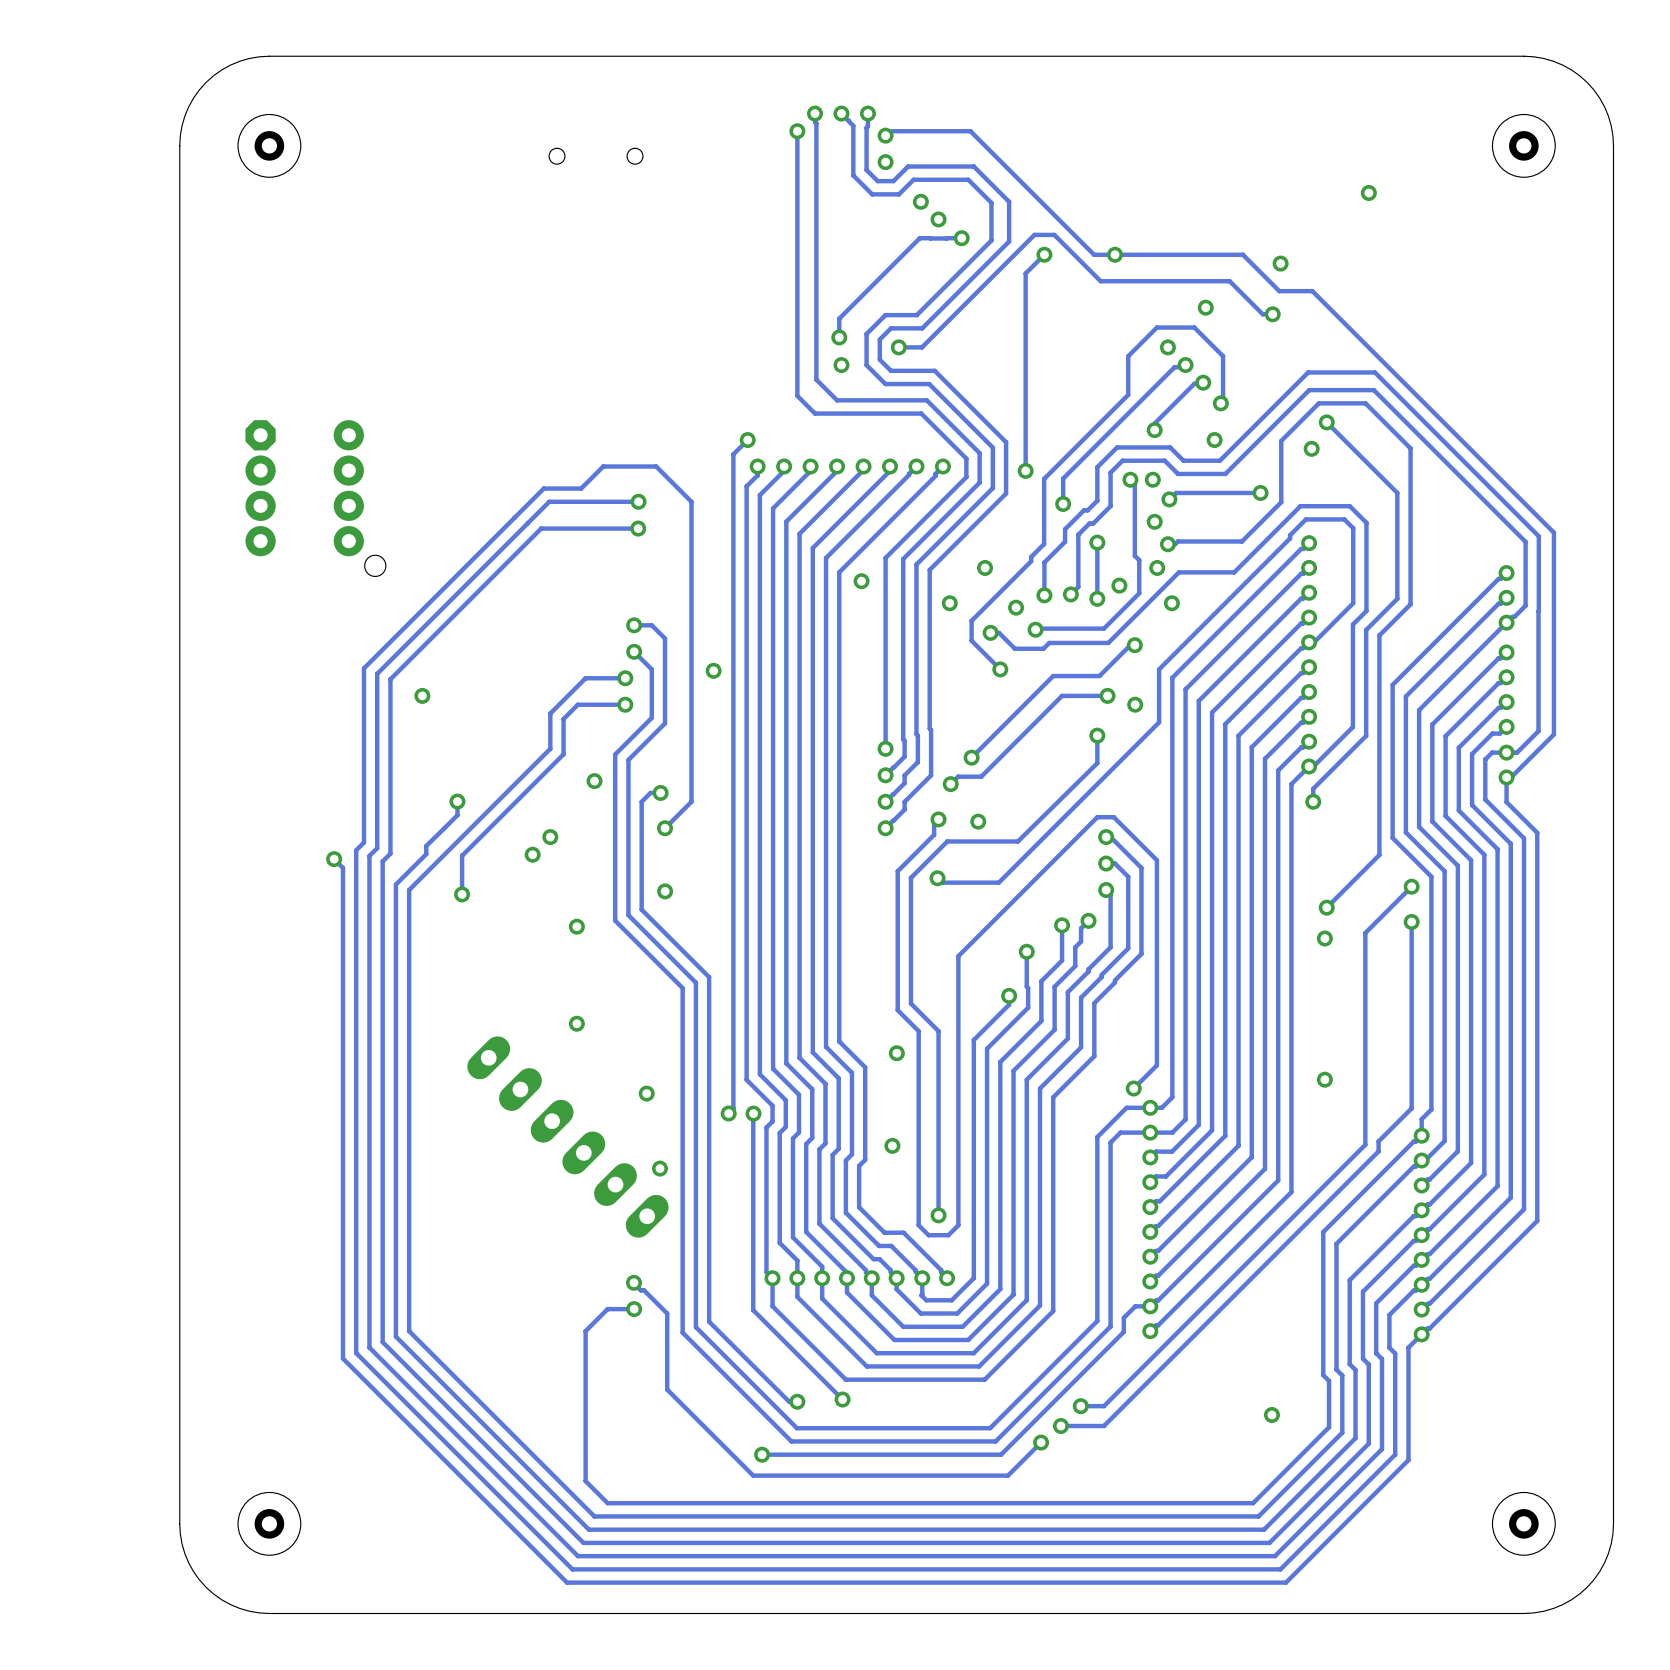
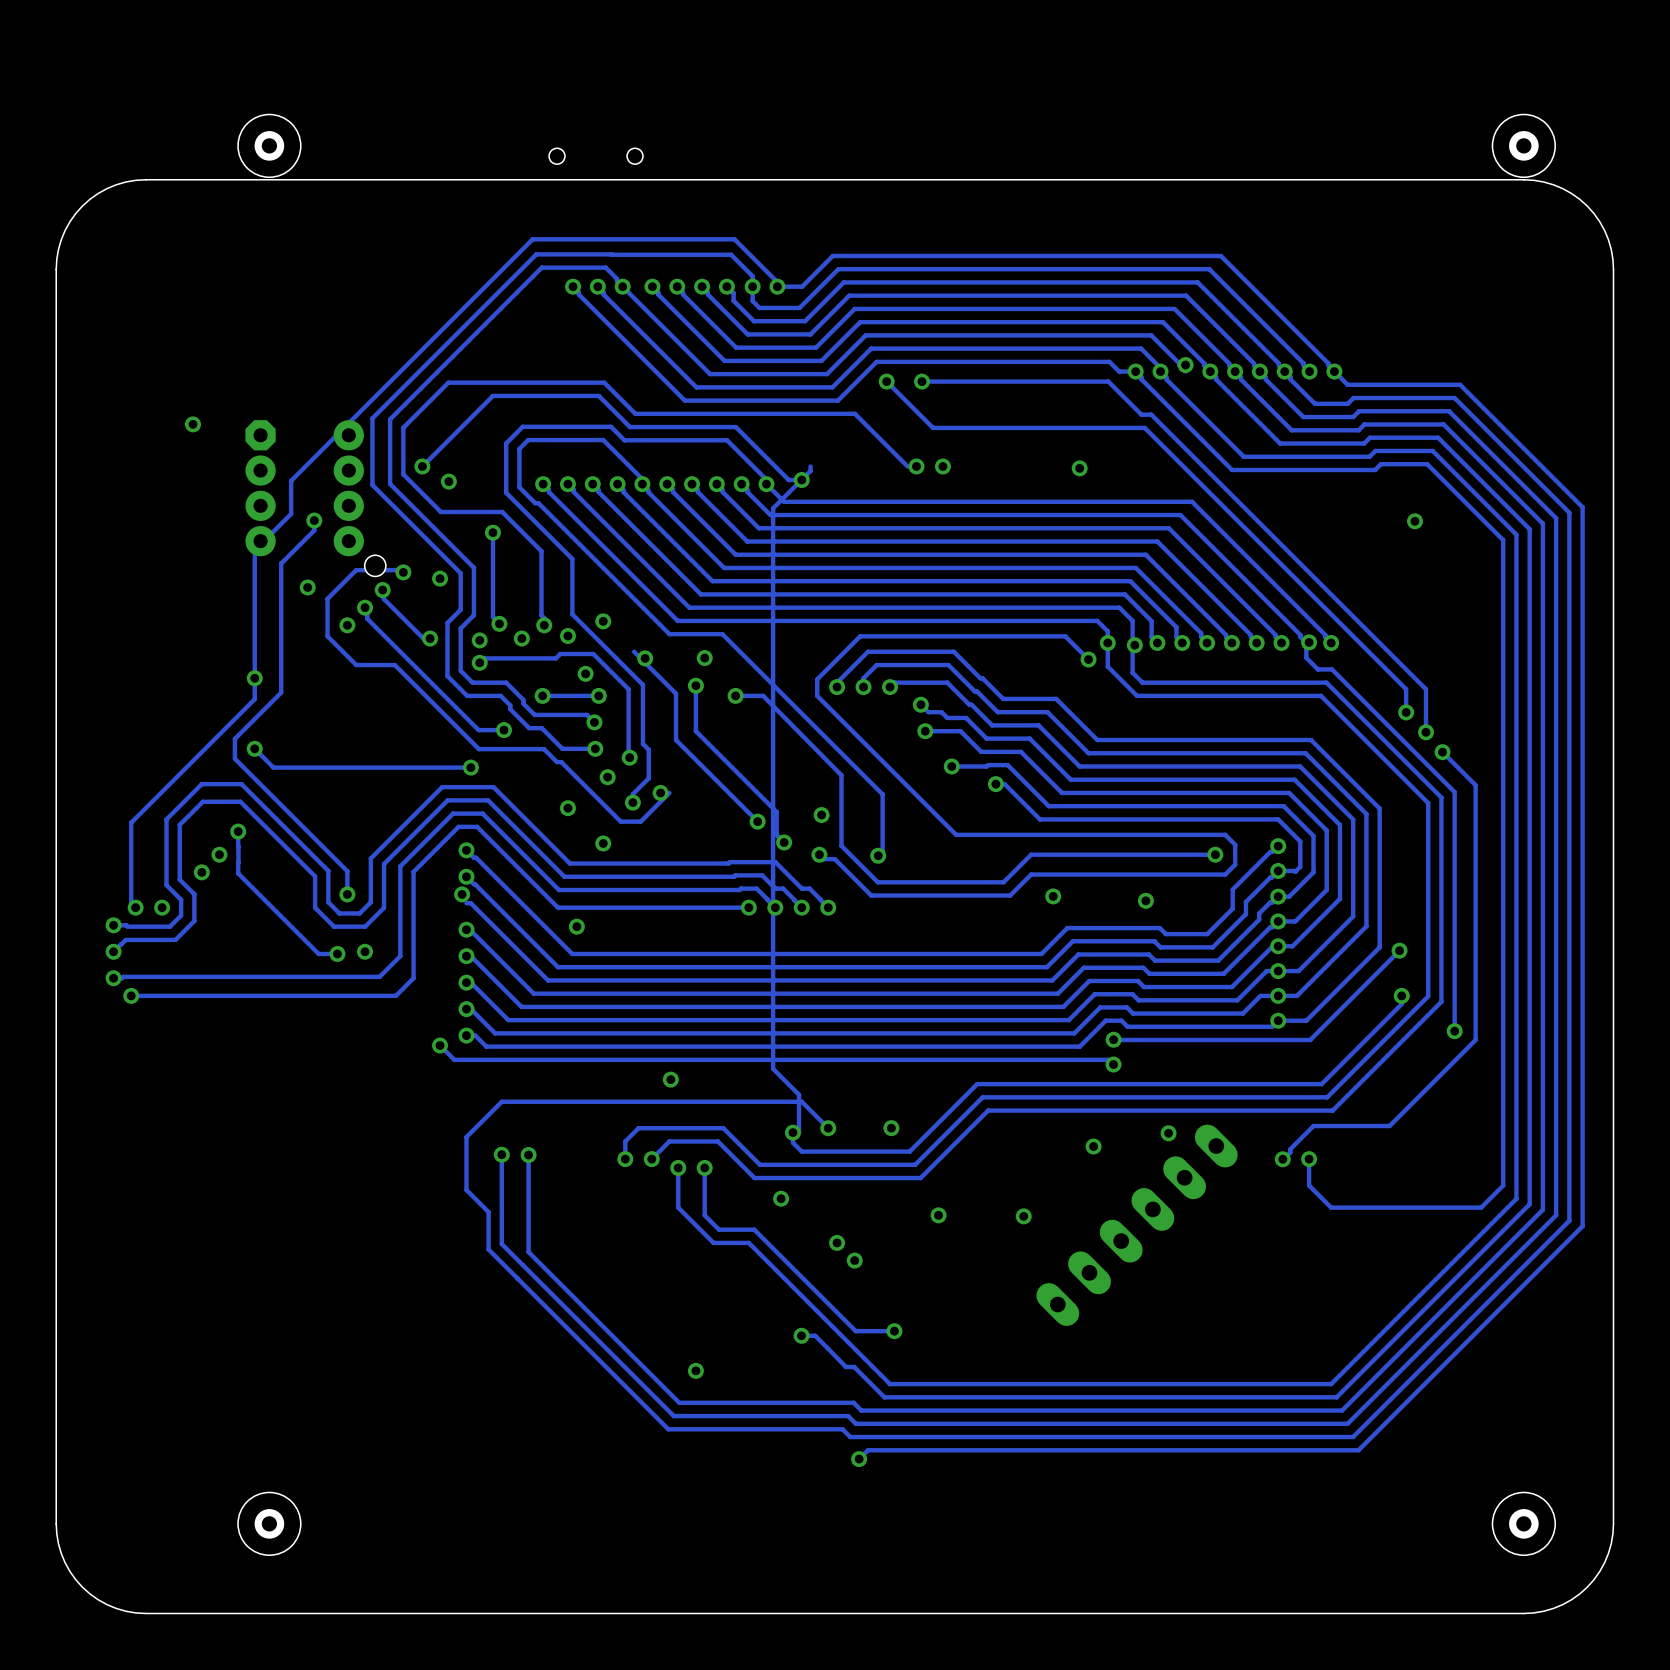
track: (815, 113) (816, 379) (837, 400) (926, 400) (979, 453) (979, 482) (903, 559) (904, 756) (885, 775) -> none
via: (815, 113) -> none
track: (841, 113) (853, 125) (853, 175) (872, 194) (898, 194) (913, 179) (968, 179) (991, 202) (991, 240) (916, 315) (885, 315) (866, 334) (866, 365) (885, 384) (929, 384) (992, 447) (992, 488) (916, 564) (917, 762) (904, 775) (904, 783) (885, 801) -> none
via: (841, 113) -> none
track: (867, 113) (866, 169) (877, 181) (893, 181) (908, 166) (973, 166) (1009, 201) (1009, 241) (922, 328) (890, 328) (879, 339) (879, 359) (890, 370) (934, 370) (1006, 442) (1006, 493) (929, 569) (931, 775) (904, 801) (904, 809) (885, 828) -> none
via: (867, 113) -> none
track: (797, 131) (797, 395) (815, 413) (921, 413) (966, 458) (966, 477) (885, 557) (885, 748) -> none
via: (797, 131) -> none
track: (885, 135) (890, 131) (970, 131) (1094, 254) (1242, 254) (1279, 291) (1312, 291) (1553, 532) (1553, 734) (1507, 780) (1506, 777) (1506, 802) (1537, 832) (1537, 1220) (1408, 1347) (1408, 1460) (1285, 1582) (567, 1582) (342, 1358) (342, 867) (334, 859) -> none
via: (885, 135) -> none
via: (885, 162) -> none
via: (1368, 192) -> none
via: (920, 201) -> none
via: (938, 219) -> none
track: (961, 238) (919, 238) (839, 318) (839, 337) -> none
via: (961, 238) -> none
track: (1044, 254) (1025, 273) (1025, 470) -> none
via: (1044, 254) -> none
via: (1114, 254) -> none
via: (1280, 263) -> none
board edge: (1613, 269) (1613, 145) (1608, 116) (1599, 98) (1579, 75) (1562, 65) (1533, 56) (269, 56) (249, 58) (230, 65) (206, 82) (188, 106) (182, 125) (179, 145) (179, 1523) (182, 1543) (188, 1562) (206, 1587) (230, 1604) (249, 1611) (269, 1613) -> (1613, 269) (1611, 249) (1604, 230) (1587, 206) (1562, 188) (1543, 182) (1523, 179) (145, 179) (125, 182) (106, 188) (82, 206) (65, 230) (58, 249) (56, 269) (56, 1533) (65, 1562) (75, 1579) (98, 1599) (116, 1608) (145, 1613) (269, 1613)
track: none -> (573, 286) (684, 400) (837, 400) (876, 361) (1109, 361) (1119, 371) (1135, 371) (1232, 469) (1375, 469) (1380, 464) (1427, 464) (1503, 540) (1503, 1185) (1481, 1207) (1331, 1207) (1309, 1185) (1309, 1159)
via: none -> (573, 286)
track: none -> (597, 286) (696, 387) (832, 387) (871, 348) (1141, 348) (1160, 368) (1160, 371) (1166, 379) (1243, 456) (1369, 456) (1375, 450) (1432, 450) (1516, 534) (1516, 1198) (1331, 1384) (890, 1384) (748, 1242) (713, 1242) (678, 1207) (678, 1167)
via: none -> (597, 286)
via: none -> (622, 286)
track: none -> (652, 286) (724, 360) (821, 360) (860, 322) (1163, 322) (1204, 363) (1216, 379) (1280, 443) (1364, 443) (1369, 437) (1438, 437) (1529, 529) (1529, 1204) (1336, 1397) (884, 1397) (854, 1366) (845, 1366) (815, 1335) (801, 1335)
via: none -> (652, 286)
track: none -> (677, 286) (736, 347) (816, 347) (854, 308) (1174, 308) (1291, 430) (1358, 430) (1364, 424) (1443, 424) (1542, 523) (1542, 1209) (1342, 1410) (861, 1410) (853, 1402) (679, 1402) (528, 1252) (528, 1155)
via: none -> (677, 286)
track: none -> (702, 286) (747, 334) (810, 334) (849, 295) (1186, 295) (1254, 363) (1265, 379) (1303, 417) (1353, 417) (1359, 411) (1449, 411) (1556, 518) (1556, 1215) (1347, 1423) (855, 1423) (848, 1416) (673, 1416) (501, 1244) (501, 1154)
via: none -> (702, 286)
track: none -> (726, 286) (733, 293) (733, 300) (754, 321) (805, 321) (843, 282) (1197, 282) (1278, 363) (1290, 379) (1314, 403) (1347, 403) (1353, 398) (1454, 398) (1569, 512) (1569, 1220) (1353, 1437) (850, 1437) (842, 1429) (668, 1429) (488, 1249) (488, 1212) (466, 1189) (466, 1137) (501, 1101) (801, 1101) (828, 1128)
via: none -> (726, 286)
via: none -> (752, 286)
via: none -> (777, 286)
via: (1205, 307) -> none
track: (1272, 314) (1262, 314) (1229, 281) (1100, 281) (1054, 234) (1034, 234) (921, 347) (898, 347) -> none
via: (1272, 314) -> none
via: (839, 337) -> none
via: (898, 347) -> none
via: (1167, 347) -> none
via: (841, 365) -> none
track: (1185, 365) (1183, 367) (1174, 367) (1063, 478) (1063, 504) -> none
via: none -> (1135, 371)
via: none -> (1160, 371)
track: none -> (1185, 371) (1151, 335) (865, 335) (826, 374) (710, 374) (605, 267) (541, 267) (390, 419) (390, 483) (473, 567) (473, 615) (460, 628) (460, 670) (472, 682) (506, 682) (523, 700) (523, 703) (534, 714) (586, 714) (594, 722)
via: none -> (1235, 371)
via: none -> (1259, 371)
via: none -> (1284, 371)
track: none -> (1309, 371) (1209, 269) (838, 269) (799, 307) (759, 307) (752, 301) (752, 276) (731, 254) (536, 254) (372, 418) (372, 485) (460, 573) (460, 609) (447, 622) (447, 676) (467, 695) (500, 695) (510, 705) (510, 709) (529, 728) (541, 728) (562, 748) (595, 748)
via: none -> (1309, 371)
via: none -> (1334, 371)
track: none -> (886, 381) (933, 427) (1144, 427) (1406, 689) (1406, 712)
via: none -> (886, 381)
track: none -> (921, 381) (1108, 381) (1141, 414) (1151, 414) (1426, 689) (1426, 732)
via: none -> (921, 381)
track: (1203, 382) (1194, 383) (1154, 423) (1154, 430) -> none
via position: (1203, 382) -> (1210, 371)
track: (1220, 403) (1223, 400) (1223, 356) (1194, 327) (1156, 327) (1128, 356) (1128, 394) (1044, 478) (1044, 544) (1031, 557) (1031, 561) (971, 620) (971, 640) (1000, 669) -> none
via: (1220, 403) -> none
track: (1326, 422) (1397, 492) (1397, 598) (1366, 629) (1366, 735) (1313, 788) (1313, 801) -> none
via: (1326, 422) -> none
via: none -> (192, 424)
via: (1154, 430) -> none
track: (747, 440) (733, 454) (733, 1108) (728, 1113) -> none
via: (747, 440) -> none
via: (1214, 440) -> none
via: (1311, 448) -> none
track: none -> (422, 466) (492, 395) (598, 395) (629, 427) (735, 427) (788, 479) (801, 479)
via: none -> (422, 466)
track: (757, 466) (757, 475) (746, 486) (746, 1079) (772, 1105) (772, 1121) (766, 1127) (766, 1272) (772, 1278) (772, 1306) (845, 1379) (984, 1379) (1053, 1311) (1053, 1097) (1094, 1056) (1094, 1003) (1141, 953) (1141, 867) (1110, 837) (1106, 837) -> none
via: (757, 466) -> none
track: (784, 466) (784, 470) (759, 495) (759, 1074) (785, 1100) (785, 1126) (779, 1133) (779, 1242) (797, 1260) (797, 1296) (866, 1366) (979, 1366) (1040, 1305) (1040, 1088) (1081, 1047) (1081, 997) (1128, 948) (1128, 876) (1114, 863) (1106, 863) -> none
via: (784, 466) -> none
via position: (810, 466) -> (801, 479)
track: (837, 466) (837, 470) (786, 521) (786, 1063) (812, 1089) (812, 1137) (806, 1144) (806, 1231) (847, 1272) (847, 1292) (894, 1339) (968, 1339) (1013, 1294) (1013, 1070) (1054, 1029) (1054, 986) (1075, 966) (1075, 947) (1081, 941) (1081, 928) (1088, 920) -> none
via: (837, 466) -> none
track: (863, 466) (863, 469) (799, 533) (799, 1057) (825, 1083) (825, 1143) (819, 1149) (819, 1223) (866, 1270) (871, 1278) (871, 1295) (903, 1326) (962, 1326) (1000, 1289) (1000, 1062) (1041, 1020) (1041, 981) (1062, 960) (1062, 925) -> none
via: (863, 466) -> none
track: (890, 466) (890, 470) (812, 548) (812, 1052) (838, 1078) (838, 1148) (832, 1154) (832, 1218) (873, 1259) (879, 1259) (890, 1270) (896, 1278) (896, 1289) (920, 1313) (957, 1313) (987, 1283) (987, 1048) (1028, 1007) (1026, 951) -> none
via: (890, 466) -> none
track: none -> (907, 466) (854, 413) (635, 413) (604, 382) (448, 382) (403, 427) (403, 474) (440, 512) (502, 512) (541, 551) (541, 615) (544, 618) (544, 625)
track: (916, 466) (826, 558) (826, 1046) (851, 1072) (851, 1154) (845, 1160) (845, 1212) (879, 1245) (891, 1245) (915, 1270) (922, 1278) (921, 1295) (926, 1300) (951, 1300) (973, 1278) (973, 1040) (1009, 1004) (1009, 995) -> none
track: (942, 466) (839, 572) (839, 1041) (865, 1067) (865, 1159) (859, 1165) (859, 1207) (884, 1232) (903, 1232) (947, 1278) -> none
via: none -> (1079, 468)
via: (1025, 470) -> none
track: (1130, 479) (1134, 484) (1134, 555) (1139, 560) (1139, 593) (1103, 628) (1035, 629) -> none
via: (1130, 479) -> none
via: (1152, 479) -> none
via: none -> (448, 481)
track: none -> (543, 484) (677, 620) (1097, 620) (1107, 631) (1107, 666) (1137, 695) (1321, 695) (1428, 803) (1428, 996) (1327, 1097) (982, 1097) (915, 1164) (759, 1164) (723, 1128) (638, 1128) (625, 1141) (625, 1159)
via: none -> (543, 484)
track: none -> (567, 484) (689, 607) (1119, 607) (1132, 620) (1132, 672) (1142, 682) (1326, 682) (1441, 797) (1441, 1001) (1332, 1110) (988, 1110) (920, 1178) (754, 1178) (717, 1141) (669, 1141) (651, 1159)
via: none -> (567, 484)
track: none -> (592, 484) (700, 594) (1124, 594) (1151, 621) (1151, 637) (1157, 642)
via: none -> (592, 484)
track: none -> (617, 484) (712, 581) (1130, 581) (1176, 627) (1176, 637) (1182, 642)
via: none -> (617, 484)
via: none -> (642, 484)
track: none -> (667, 484) (735, 554) (1145, 554) (1231, 642)
via: none -> (667, 484)
track: none -> (692, 484) (747, 541) (1157, 541) (1256, 642)
via: none -> (692, 484)
track: none -> (716, 484) (758, 528) (1168, 528) (1281, 642)
via: none -> (716, 484)
track: none -> (741, 484) (770, 515) (1180, 515) (1300, 635) (1306, 642) (1306, 657) (1317, 669) (1331, 669) (1454, 792) (1454, 1031)
via: none -> (741, 484)
via: none -> (766, 484)
track: (1260, 492) (1176, 492) (1169, 499) -> none
via: (1260, 492) -> none
via: (1169, 499) -> none
track: (638, 501) (549, 501) (377, 673) (377, 848) (369, 855) (369, 1347) (577, 1556) (1275, 1556) (1381, 1449) (1381, 1359) (1376, 1353) (1376, 1303) (1413, 1265) (1429, 1254) (1497, 1186) (1497, 849) (1458, 810) (1458, 747) (1506, 702) -> none
via: (638, 501) -> none
via: (1063, 504) -> none
track: none -> (314, 520) (314, 530) (281, 563) (281, 692) (234, 738) (234, 758) (347, 871) (347, 894)
via: none -> (314, 520)
via: (1154, 521) -> none
via: none -> (1414, 521)
track: (638, 528) (541, 528) (390, 679) (390, 853) (382, 861) (382, 1342) (583, 1542) (1269, 1542) (1368, 1443) (1368, 1364) (1362, 1358) (1362, 1291) (1484, 1174) (1484, 854) (1445, 816) (1445, 736) (1506, 677) -> none
via: (638, 528) -> none
track: none -> (492, 532) (492, 617) (499, 623)
via: none -> (492, 532)
track: (1097, 542) (1097, 598) -> none
via: (1097, 542) -> none
track: (1309, 543) (1172, 677) (1172, 1097) (1161, 1107) (1126, 1107) (1097, 1137) (1097, 1321) (990, 1428) (796, 1428) (695, 1327) (695, 982) (628, 915) (628, 759) (665, 723) (665, 638) (651, 625) (634, 625) -> none
via: (1309, 543) -> none
track: (1167, 544) (1175, 544) (1177, 541) (1241, 541) (1281, 502) (1281, 440) (1318, 403) (1365, 403) (1410, 448) (1410, 604) (1379, 635) (1379, 854) (1326, 907) -> none
via: (1167, 544) -> none
via: (985, 567) -> none
via: (1157, 567) -> none
track: (1309, 567) (1185, 689) (1185, 1119) (1172, 1132) (1120, 1132) (1110, 1142) (1110, 1326) (995, 1441) (791, 1441) (682, 1332) (682, 988) (615, 920) (615, 754) (651, 717) (651, 669) -> (757, 821) (676, 740) (676, 693) (651, 669)
via: (1309, 567) -> none
track: none -> (403, 572) (400, 570) (356, 570) (327, 598) (327, 636) (356, 665) (394, 665) (478, 749) (544, 749) (557, 762) (561, 762) (620, 821) (640, 821) (669, 792)
via: none -> (403, 572)
track: (1506, 573) (1392, 684) (1392, 837) (1431, 876) (1431, 1109) (1421, 1119) (1421, 1135) (1323, 1232) (1323, 1375) (1329, 1380) (1329, 1427) (1253, 1503) (607, 1503) (585, 1481) (585, 1331) (607, 1309) (634, 1309) -> none
via: (1506, 573) -> none
via: none -> (440, 578)
via: (861, 581) -> none
via: (1119, 585) -> none
via: none -> (307, 587)
track: none -> (382, 590) (383, 598) (423, 638) (430, 638)
via: none -> (382, 590)
track: (1309, 592) (1198, 700) (1198, 1124) (1172, 1151) (1156, 1151) (1150, 1157) -> none
via: (1309, 592) -> none
track: (1070, 594) (1078, 586) (1078, 534) (1089, 523) (1093, 523) (1110, 506) (1110, 472) (1122, 460) (1164, 460) (1178, 473) (1225, 473) (1309, 390) (1373, 390) (1525, 541) (1525, 605) (1419, 710) (1419, 826) (1457, 865) (1457, 1151) (1421, 1185) -> none
via: (1070, 594) -> none
track: (1044, 595) (1044, 562) (1065, 541) (1065, 529) (1083, 510) (1087, 510) (1097, 500) (1097, 467) (1117, 447) (1170, 447) (1183, 460) (1219, 460) (1308, 372) (1374, 372) (1538, 536) (1538, 731) (1517, 752) (1492, 752) (1485, 759) (1485, 799) (1524, 838) (1524, 1209) (1421, 1309) -> none
via: (1044, 595) -> none
track: (1506, 597) (1405, 696) (1405, 832) (1444, 871) (1444, 1141) (1425, 1160) (1421, 1160) (1413, 1166) (1336, 1243) (1336, 1369) (1342, 1375) (1342, 1432) (1258, 1516) (594, 1516) (409, 1331) (409, 890) (550, 748) (550, 713) (585, 678) (625, 678) -> none
via: (1506, 597) -> none
via: (1097, 598) -> none
via: (949, 603) -> none
via: (1171, 603) -> none
track: none -> (365, 607) (367, 609) (367, 618) (478, 730) (504, 730)
via: none -> (365, 607)
via: (1016, 607) -> none
track: (1309, 617) (1212, 712) (1212, 1130) (1165, 1176) (1156, 1176) (1150, 1182) -> none
via: (1309, 617) -> none
via: none -> (603, 621)
via: (1506, 622) -> none
via: none -> (499, 623)
via: none -> (347, 625)
via: none -> (544, 625)
via: (634, 625) -> none
via: (1035, 629) -> none
track: (990, 632) (999, 632) (1014, 648) (1043, 648) (1049, 642) (1108, 642) (1178, 572) (1234, 572) (1300, 506) (1349, 506) (1366, 522) (1366, 611) (1352, 624) (1352, 727) (1313, 766) (1309, 766) (1291, 784) (1291, 1192) (1150, 1331) -> none
via: (990, 632) -> none
via: none -> (567, 636)
via: none -> (430, 638)
via: none -> (521, 638)
via: none -> (479, 640)
via: none -> (1107, 642)
via: none -> (1157, 642)
via: none -> (1182, 642)
track: none -> (1207, 642) (1201, 637) (1201, 633) (1135, 567) (724, 567) (648, 492) (642, 484) (642, 479) (603, 440) (528, 440) (519, 448) (519, 487) (535, 503) (538, 503) (669, 634) (722, 634) (882, 794) (882, 851) (878, 855)
via: none -> (1207, 642)
via: none -> (1231, 642)
via: none -> (1256, 642)
via: none -> (1281, 642)
track: none -> (1331, 642) (1192, 501) (784, 501) (766, 484) (766, 479) (727, 440) (624, 440) (611, 426) (522, 426) (506, 443) (506, 492) (572, 559) (572, 614) (642, 684) (642, 743) (648, 749) (648, 778) (632, 794) (632, 802)
via: none -> (1331, 642)
track: (1134, 645) (1130, 645) (1099, 676) (1053, 676) (971, 757) -> none
via position: (634, 651) -> (645, 658)
track: (1506, 652) (1432, 724) (1432, 821) (1471, 860) (1471, 1163) (1429, 1204) (1413, 1216) (1349, 1280) (1349, 1364) (1355, 1369) (1355, 1438) (1264, 1529) (588, 1529) (395, 1336) (395, 884) (426, 854) (426, 845) (457, 815) (457, 801) -> none
via: (1506, 652) -> none
track: none -> (1088, 659) (1065, 636) (860, 636) (817, 679) (817, 695) (956, 834) (1225, 834) (1235, 844) (1235, 864) (1225, 874) (1031, 874) (1010, 895) (871, 895) (834, 859) (823, 859) (819, 854)
via: none -> (1088, 659)
track: none -> (479, 662) (484, 658) (555, 658) (560, 653) (593, 653) (628, 689) (629, 757)
via: none -> (479, 662)
track: (1309, 667) (1238, 735) (1238, 1145) (1150, 1231) -> none
via: (1309, 667) -> none
via: (1000, 669) -> none
via position: (713, 670) -> (704, 658)
via: none -> (585, 673)
via: (1506, 677) -> none
via: none -> (254, 678)
via: (625, 678) -> none
track: none -> (695, 685) (695, 731) (776, 811) (776, 835) (784, 842)
via: none -> (695, 685)
track: none -> (837, 687) (837, 682) (867, 651) (953, 651) (1003, 698) (1056, 698) (1097, 740) (1311, 740) (1379, 808) (1379, 947) (1306, 1020) (1278, 1020) (1272, 1026) (1127, 1026) (1121, 1020) (1105, 1020) (1079, 1046) (486, 1046) (475, 1035) (466, 1035)
via: none -> (837, 687)
track: none -> (863, 687) (863, 678) (876, 665) (948, 665) (997, 712) (1047, 712) (1088, 753) (1305, 753) (1366, 814) (1366, 926) (1296, 995) (1260, 995) (1242, 1013) (1133, 1013) (1126, 1007) (1100, 1007) (1074, 1033) (495, 1033) (470, 1009) (466, 1009)
via: none -> (863, 687)
track: none -> (890, 687) (894, 682) (947, 682) (992, 725) (1038, 725) (1079, 766) (1300, 766) (1353, 819) (1353, 916) (1298, 971) (1266, 971) (1237, 1000) (1138, 1000) (1132, 994) (1094, 994) (1068, 1020) (508, 1020) (470, 982) (466, 982)
via: none -> (890, 687)
track: (1309, 692) (1251, 747) (1251, 1157) (1150, 1256) -> none
via: (1309, 692) -> none
via: (422, 695) -> none
via: none -> (542, 695)
track: none -> (598, 695) (542, 695)
via: none -> (598, 695)
track: none -> (735, 695) (763, 695) (841, 775) (841, 845) (877, 882) (1003, 882) (1031, 854) (1215, 854)
via: none -> (735, 695)
track: (1107, 695) (1062, 695) (981, 776) (958, 776) (950, 784) -> none
via: (1107, 695) -> none
via: (1506, 702) -> none
track: (625, 704) (577, 704) (563, 719) (563, 754) (462, 855) (462, 894) -> none
via: (625, 704) -> none
track: none -> (920, 704) (928, 712) (941, 712) (947, 717) (966, 717) (986, 738) (1029, 738) (1070, 779) (1294, 779) (1339, 825) (1339, 898) (1292, 946) (1272, 946) (1231, 987) (1144, 987) (1137, 981) (1089, 981) (1063, 1006) (521, 1006) (470, 956) (466, 956)
via: none -> (920, 704)
via: (1135, 704) -> none
via: none -> (1406, 712)
track: (1309, 716) (1264, 758) (1264, 1168) (1150, 1281) -> none
via: (1309, 716) -> none
via: none -> (594, 722)
track: (1506, 726) (1499, 733) (1492, 733) (1472, 754) (1472, 805) (1510, 843) (1510, 1197) (1429, 1278) (1413, 1290) (1389, 1314) (1389, 1347) (1395, 1353) (1395, 1454) (1280, 1569) (572, 1569) (356, 1353) (356, 850) (363, 842) (363, 668) (543, 488) (581, 488) (603, 466) (656, 466) (691, 501) (691, 801) (665, 828) -> none
via: (1506, 726) -> none
via: none -> (504, 730)
track: none -> (925, 731) (960, 731) (981, 751) (1020, 751) (1062, 792) (1289, 792) (1326, 830) (1326, 890) (1295, 921) (1278, 921) (1270, 927) (1223, 973) (1149, 973) (1143, 967) (1083, 967) (1057, 993) (533, 993) (469, 929) (466, 929)
via: none -> (925, 731)
via: none -> (1426, 732)
track: (1097, 735) (1097, 763) (1017, 841) (947, 841) (910, 877) (910, 1003) (938, 1031) (938, 1215) -> none
via: (1097, 735) -> none
track: (1309, 741) (1278, 770) (1278, 1180) (1158, 1300) (1150, 1306) (1135, 1306) (1123, 1317) (1123, 1331) (1001, 1454) (762, 1454) -> none
via: (1309, 741) -> none
track: none -> (254, 748) (273, 767) (470, 767)
via: none -> (254, 748)
via: none -> (595, 748)
via: (885, 748) -> none
track: none -> (1442, 752) (1475, 785) (1475, 1040) (1389, 1126) (1313, 1126) (1282, 1159)
via: none -> (1442, 752)
via: (1506, 752) -> none
via: none -> (629, 757)
via: (971, 757) -> none
track: none -> (951, 766) (1007, 765) (1048, 806) (1283, 806) (1313, 836) (1313, 872) (1289, 896) (1278, 896) (1270, 902) (1259, 913) (1259, 919) (1218, 960) (1154, 960) (1148, 954) (1078, 954) (1052, 980) (548, 980) (470, 903) (466, 903)
via: none -> (951, 766)
via: (1309, 766) -> none
via: none -> (470, 767)
via: (885, 775) -> none
via: (1506, 777) -> none
via position: (594, 781) -> (607, 777)
via: (950, 784) -> none
track: none -> (995, 784) (1004, 784) (1040, 819) (1278, 819) (1300, 841) (1300, 866) (1295, 871) (1278, 870) (1270, 877) (1245, 901) (1245, 914) (1212, 947) (1160, 947) (1154, 941) (1072, 941) (1046, 967) (558, 967) (466, 876)
via: none -> (995, 784)
track: (660, 792) (650, 792) (641, 801) (641, 909) (709, 977) (709, 1321) (789, 1401) (797, 1401) -> none
via: (457, 801) -> none
via: (885, 801) -> none
via: (1313, 801) -> none
via: none -> (632, 802)
via: none -> (567, 808)
via: none -> (821, 815)
track: (938, 819) (934, 823) (934, 834) (897, 871) (897, 1010) (918, 1031) (918, 1225) (928, 1235) (948, 1235) (958, 1225) (958, 956) (1097, 817) (1113, 817) (1156, 860) (1156, 1065) (1133, 1088) -> none
via: (938, 819) -> none
via: none -> (757, 821)
via: (978, 821) -> none
via: (665, 828) -> none
via: (885, 828) -> none
track: none -> (238, 831) (238, 873) (318, 953) (337, 953)
via: none -> (238, 831)
via: (550, 837) -> none
via: (1106, 837) -> none
via: none -> (784, 842)
via: none -> (603, 843)
track: none -> (1278, 846) (1232, 889) (1232, 908) (1207, 934) (1165, 934) (1159, 928) (1067, 928) (1041, 953) (572, 953) (466, 850)
via: none -> (1278, 846)
via: none -> (466, 850)
via: none -> (219, 854)
via: (532, 854) -> none
via: none -> (819, 854)
via: none -> (1215, 854)
via: none -> (878, 855)
via position: (334, 859) -> (347, 894)
via: (1106, 863) -> none
via: none -> (1278, 870)
via: none -> (201, 872)
via: none -> (466, 876)
track: (937, 878) (941, 882) (998, 882) (1159, 722) (1159, 669) (1290, 538) (1290, 535) (1305, 519) (1344, 519) (1353, 528) (1353, 603) (1314, 642) (1309, 642) (1301, 648) (1225, 724) (1225, 1135) (1159, 1201) (1156, 1201) (1150, 1207) -> none
via: (937, 878) -> none
track: (1411, 886) (1365, 933) (1365, 1144) (1103, 1406) (1080, 1406) -> none
via: (1411, 886) -> none
track: (1106, 890) (1110, 894) (1110, 947) (1067, 992) (1067, 1038) (1026, 1079) (1026, 1300) (973, 1353) (876, 1353) (822, 1298) (822, 1266) (792, 1237) (792, 1142) -> (1401, 995) (1401, 1004) (1321, 1084) (977, 1084) (909, 1151) (801, 1151) (792, 1142)
via: (1106, 890) -> none
via: (665, 891) -> none
via: none -> (1053, 896)
via: none -> (1278, 896)
via: none -> (1145, 900)
track: none -> (135, 907) (131, 903) (131, 822) (254, 699) (254, 550) (291, 513) (291, 480) (532, 239) (734, 239) (780, 285) (777, 286) (802, 286) (832, 255) (1220, 255) (1347, 384) (1460, 384) (1582, 507) (1582, 1226) (1358, 1450) (867, 1450) (859, 1459)
via: none -> (135, 907)
via: none -> (162, 907)
track: none -> (748, 907) (557, 907) (477, 826) (458, 826) (413, 871) (413, 978) (395, 995) (131, 995)
via: none -> (748, 907)
track: none -> (775, 907) (756, 888) (559, 890) (482, 813) (453, 813) (400, 866) (400, 956) (379, 976) (113, 978)
via: none -> (775, 907)
track: none -> (801, 907) (783, 888) (775, 888) (762, 875) (564, 876) (488, 800) (447, 800) (384, 863) (384, 907) (365, 926) (334, 926) (315, 907) (315, 876) (240, 801) (202, 801) (179, 824) (179, 879) (194, 894) (194, 921) (175, 939) (125, 939) (113, 951)
via: none -> (801, 907)
track: none -> (828, 907) (809, 888) (801, 888) (775, 862) (569, 863) (493, 787) (442, 787) (370, 858) (370, 902) (359, 913) (339, 913) (328, 902) (328, 870) (241, 784) (201, 784) (166, 819) (166, 885) (181, 899) (181, 915) (169, 926) (113, 925)
via: none -> (828, 907)
via: (1326, 907) -> none
via: (1088, 920) -> none
via: none -> (1278, 921)
track: (1411, 921) (1411, 1108) (1378, 1141) (1378, 1151) (1103, 1426) (1060, 1426) -> none
via position: (1411, 921) -> (1399, 950)
via: none -> (113, 925)
via: (1062, 925) -> none
via: none -> (466, 929)
via: (1324, 938) -> none
via: none -> (1278, 946)
track: none -> (1399, 950) (1310, 1040) (1113, 1039)
via: none -> (113, 951)
via: none -> (365, 951)
via: (1026, 951) -> none
via: none -> (337, 953)
via: none -> (466, 956)
via: none -> (1278, 971)
via: none -> (113, 978)
via: none -> (466, 982)
via: none -> (131, 995)
via: (1009, 995) -> none
via: none -> (1278, 995)
via: none -> (1401, 995)
via: none -> (466, 1009)
via: none -> (1278, 1020)
via: (576, 1023) -> none
via: none -> (1454, 1031)
via: none -> (466, 1035)
via: none -> (1113, 1039)
track: none -> (440, 1045) (454, 1059) (1108, 1059) (1113, 1064)
via: none -> (440, 1045)
via: (896, 1053) -> none
via: none -> (1113, 1064)
via: (1324, 1079) -> none
via: (1133, 1088) -> none
via position: (646, 1093) -> (670, 1079)
via: (1150, 1107) -> none
via: (728, 1113) -> none
track: (753, 1113) (753, 1310) (842, 1399) -> none
via: (753, 1113) -> none
via: none -> (828, 1128)
via: none -> (792, 1132)
via: (1150, 1132) -> none
via: none -> (1168, 1133)
via: (1421, 1135) -> none
part: (567, 1137) -> none
via position: (892, 1145) -> (891, 1128)
via: none -> (1093, 1146)
via: none -> (501, 1154)
via: none -> (528, 1155)
via: (1150, 1157) -> none
via: none -> (625, 1159)
via: none -> (1282, 1159)
via: none -> (1309, 1159)
via: (1421, 1160) -> none
via: none -> (678, 1167)
track: none -> (704, 1167) (704, 1215) (719, 1229) (754, 1229) (855, 1331) (894, 1331)
via: none -> (704, 1167)
via position: (659, 1168) -> (651, 1159)
via: (1150, 1182) -> none
via: (1421, 1185) -> none
via: none -> (781, 1198)
via: (1150, 1207) -> none
via: (1421, 1210) -> none
via: none -> (1023, 1216)
part: none -> (1137, 1225)
via: (1150, 1231) -> none
via: (1421, 1235) -> none
via: none -> (837, 1242)
via: (1150, 1256) -> none
via: (1421, 1259) -> none
via: none -> (854, 1260)
via: (772, 1278) -> none
via: (797, 1278) -> none
via: (822, 1278) -> none
via: (847, 1278) -> none
via: (871, 1278) -> none
via: (896, 1278) -> none
via: (922, 1278) -> none
via: (947, 1278) -> none
via: (1150, 1281) -> none
track: (633, 1282) (667, 1313) (667, 1389) (753, 1475) (1008, 1475) (1041, 1442) -> none
via: (633, 1282) -> none
via: (1421, 1284) -> none
via: (1150, 1306) -> none
via: (634, 1309) -> none
via: (1421, 1309) -> none
via: none -> (894, 1331)
via: (1150, 1331) -> none
via: (1421, 1334) -> none
via: none -> (801, 1335)
via: none -> (695, 1370)
via: (842, 1399) -> none
via: (797, 1401) -> none
via: (1080, 1406) -> none
via: (1271, 1414) -> none
via: (1060, 1426) -> none
via: (1041, 1442) -> none
via: (762, 1454) -> none
via: none -> (859, 1459)

